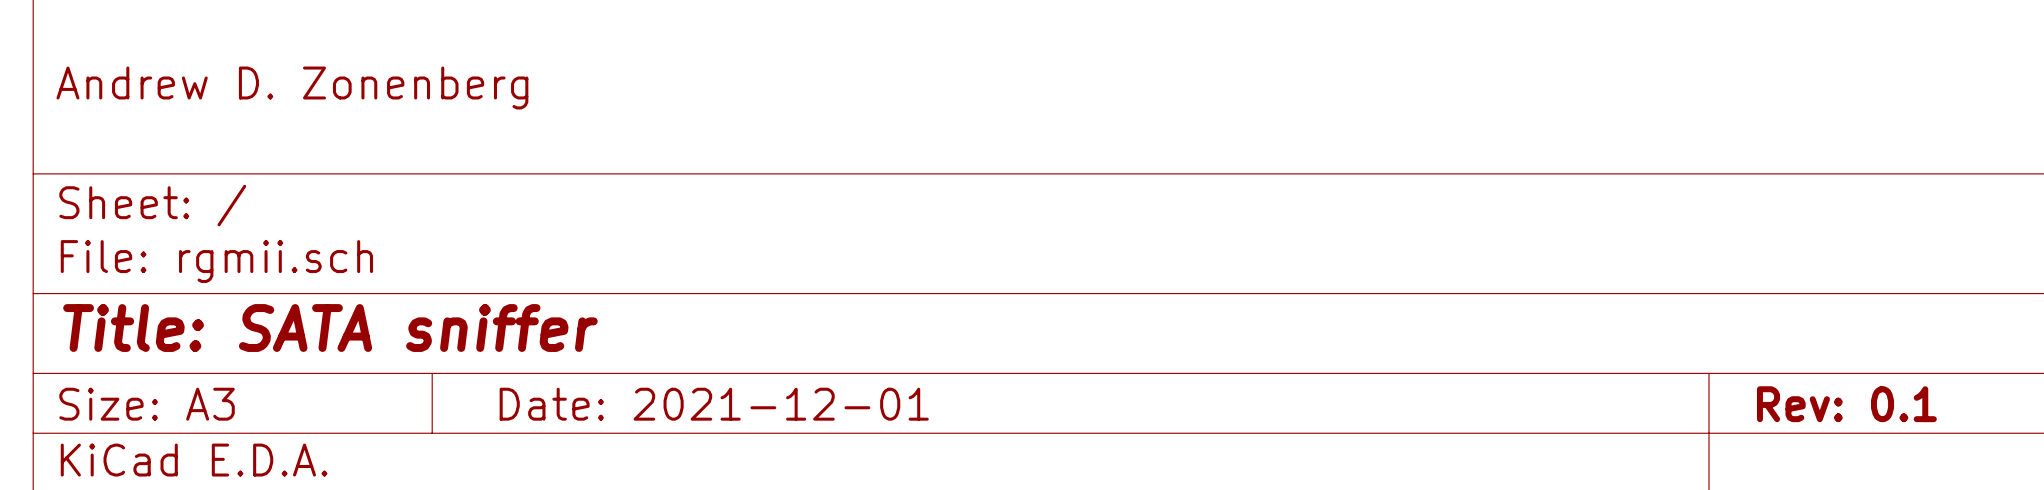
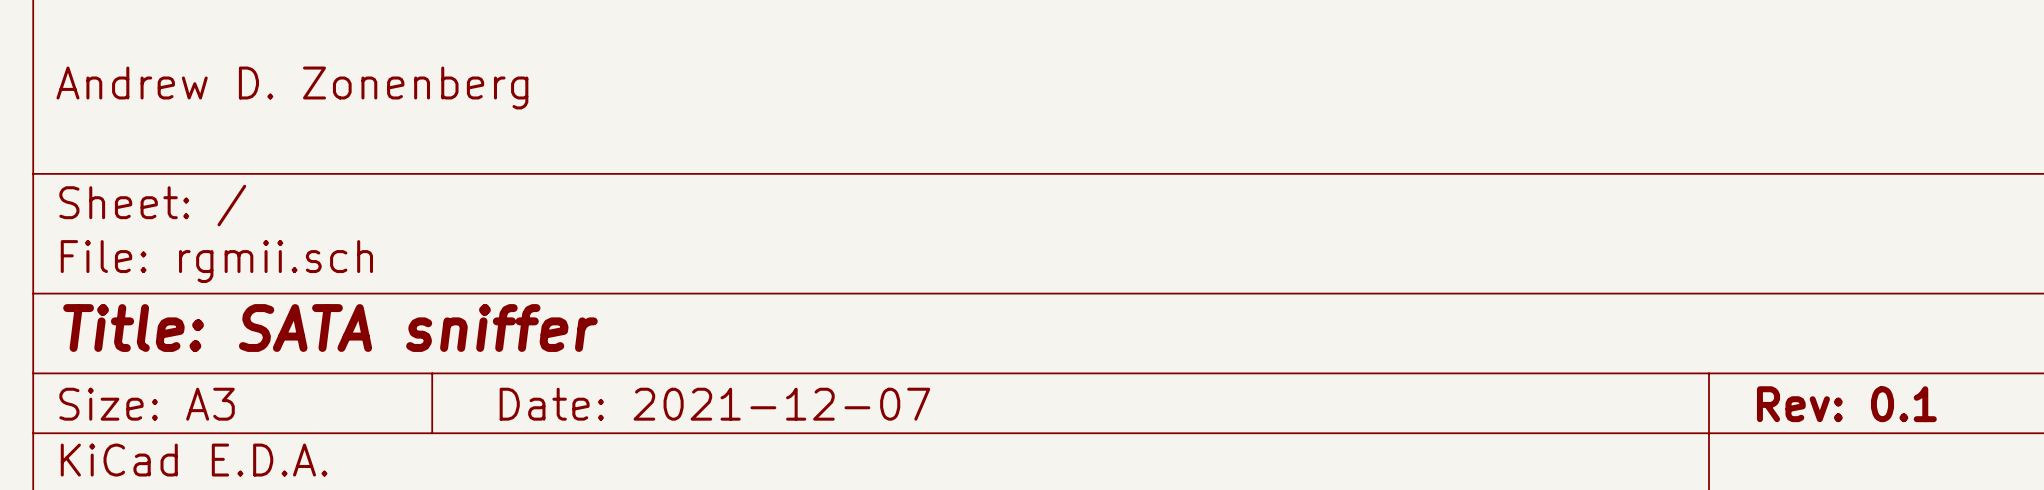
title block: Date: 2021-12-01 (714, 404) -> Date: 2021-12-07 (714, 404)

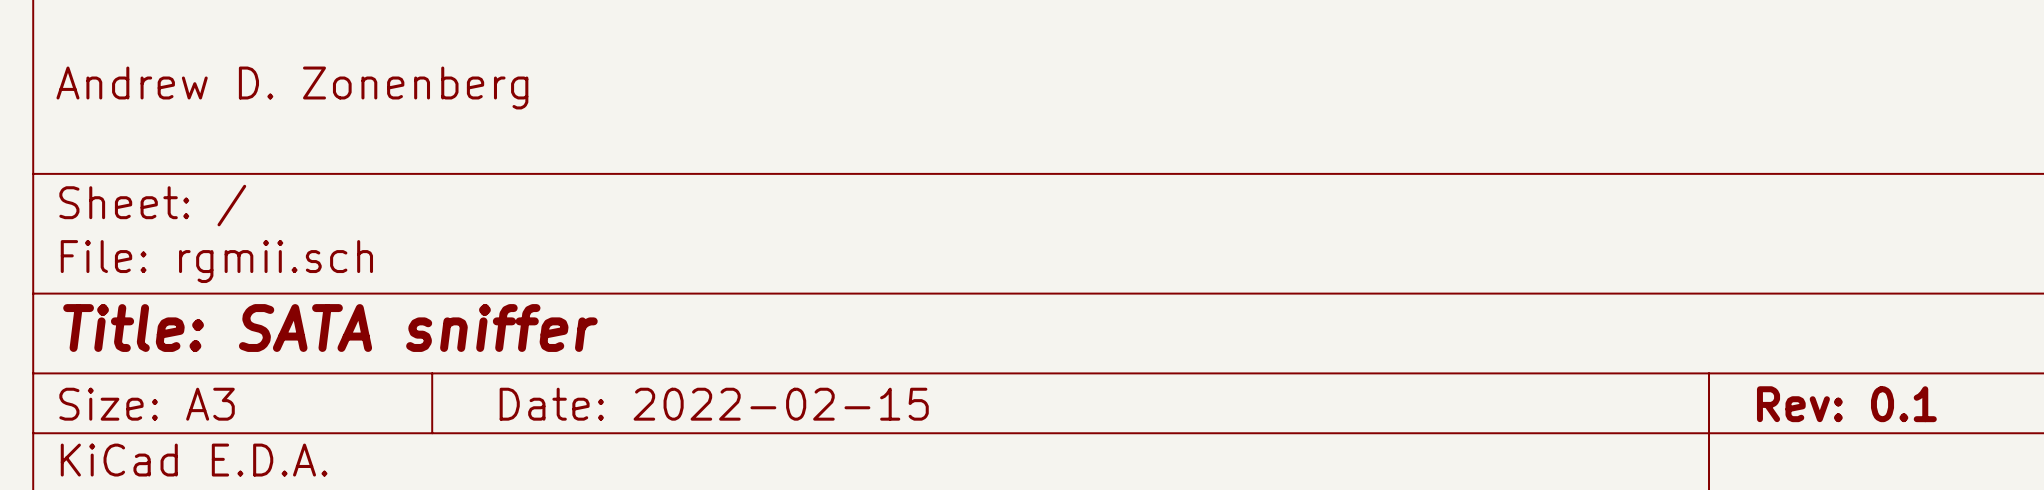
title block: Date: 2021-12-07 (714, 404) -> Date: 2022-02-15 (714, 404)

